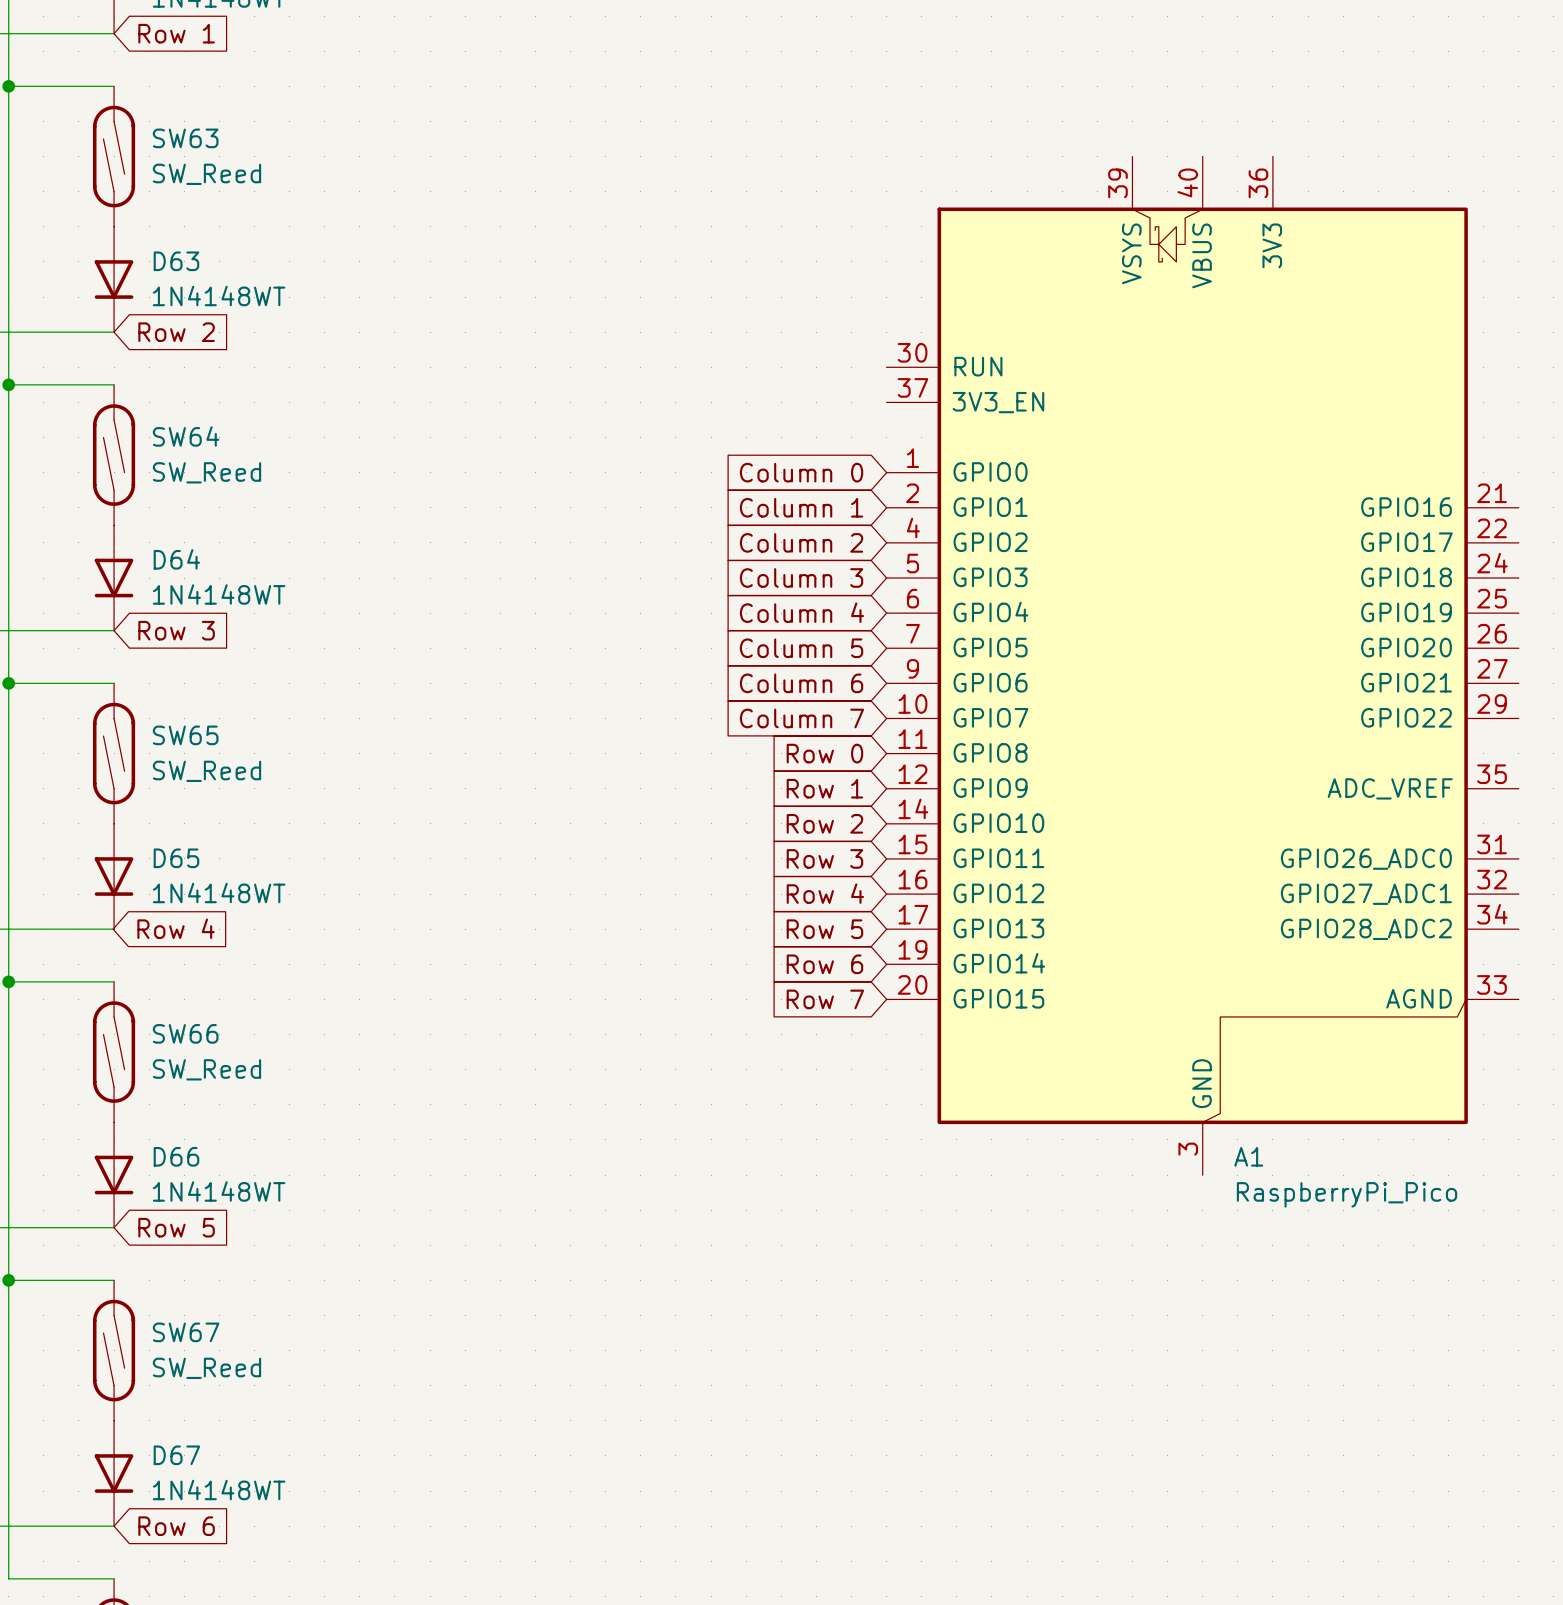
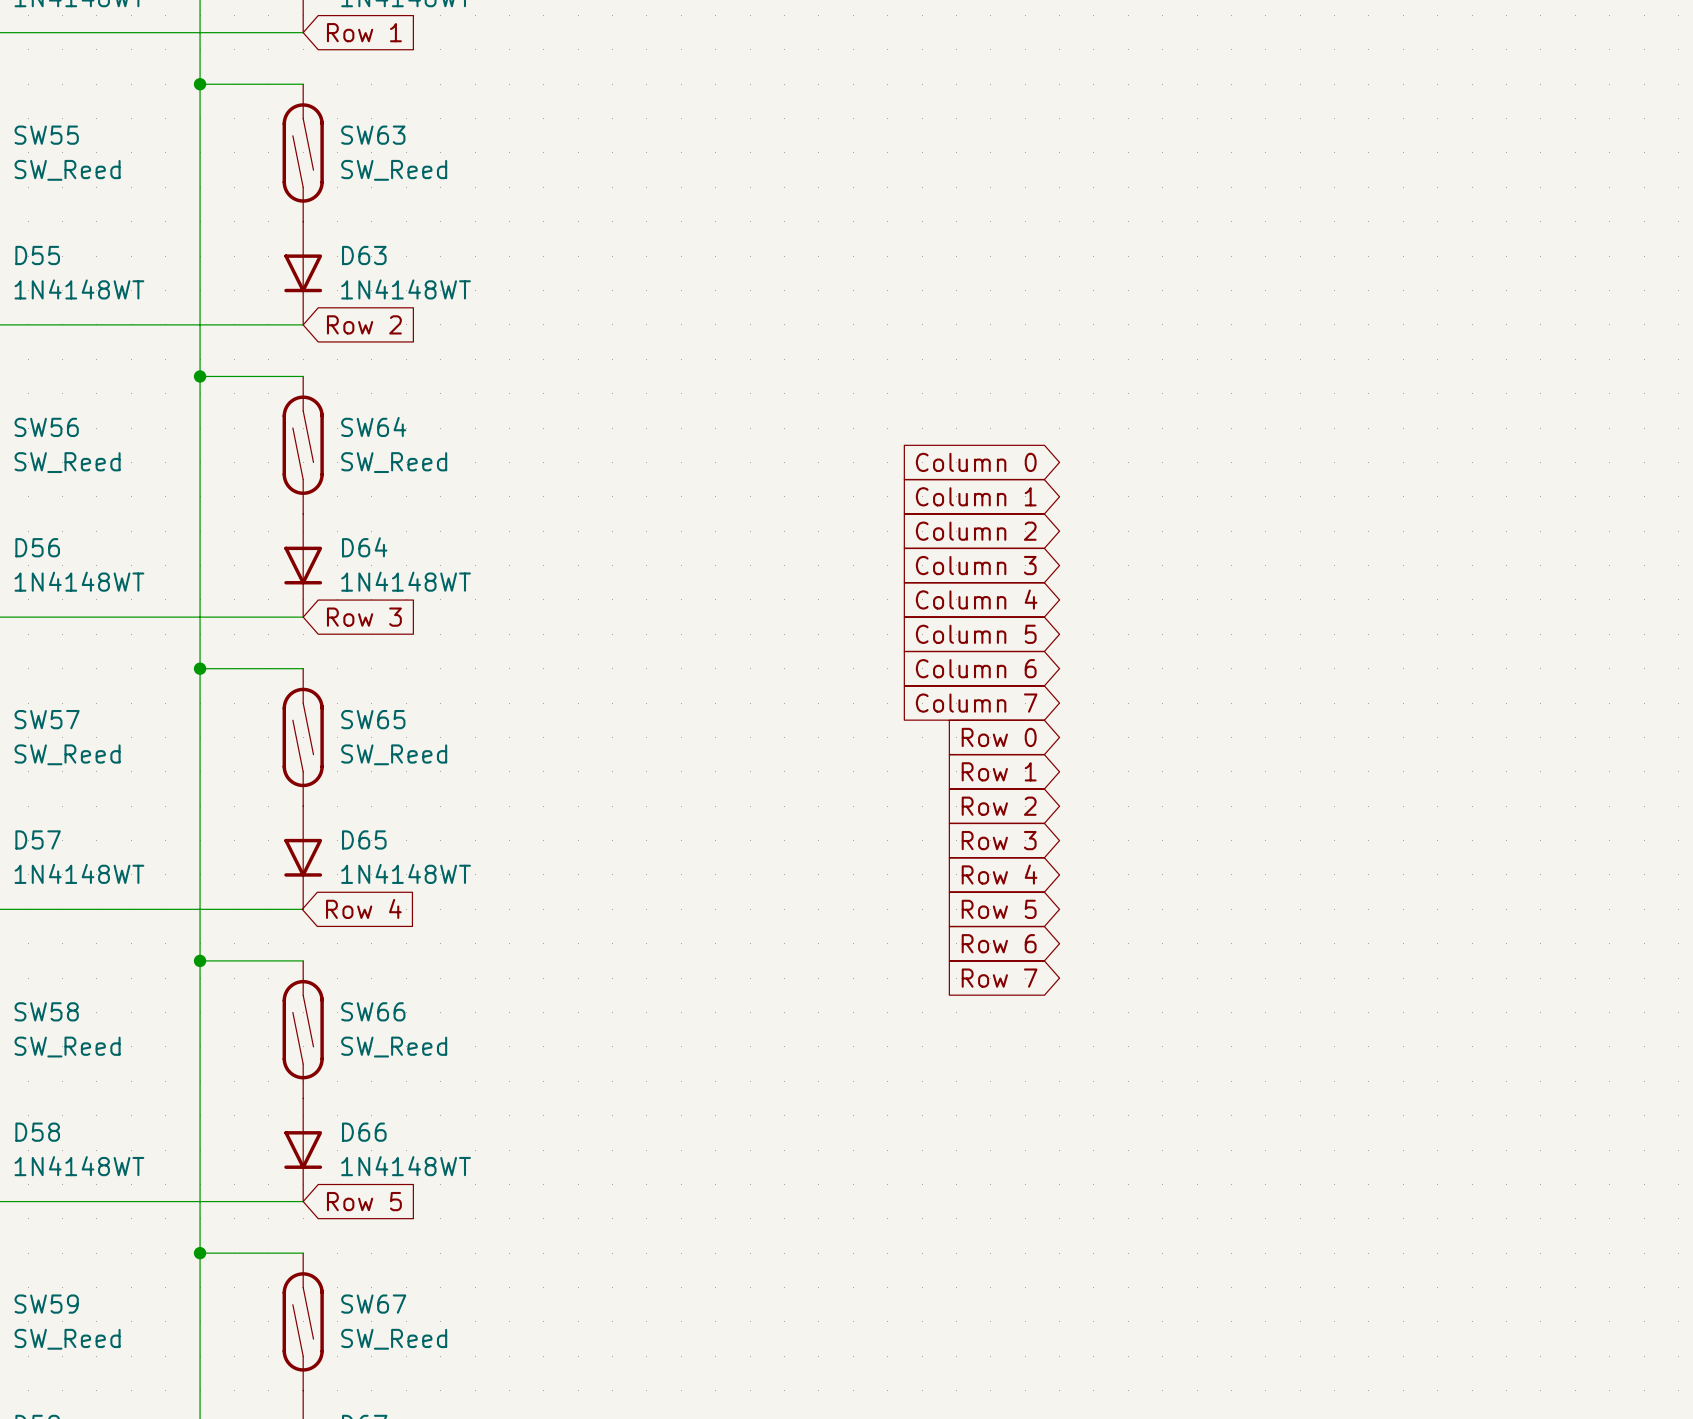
A1: RaspberryPi_Pico (1202, 665) -> none

